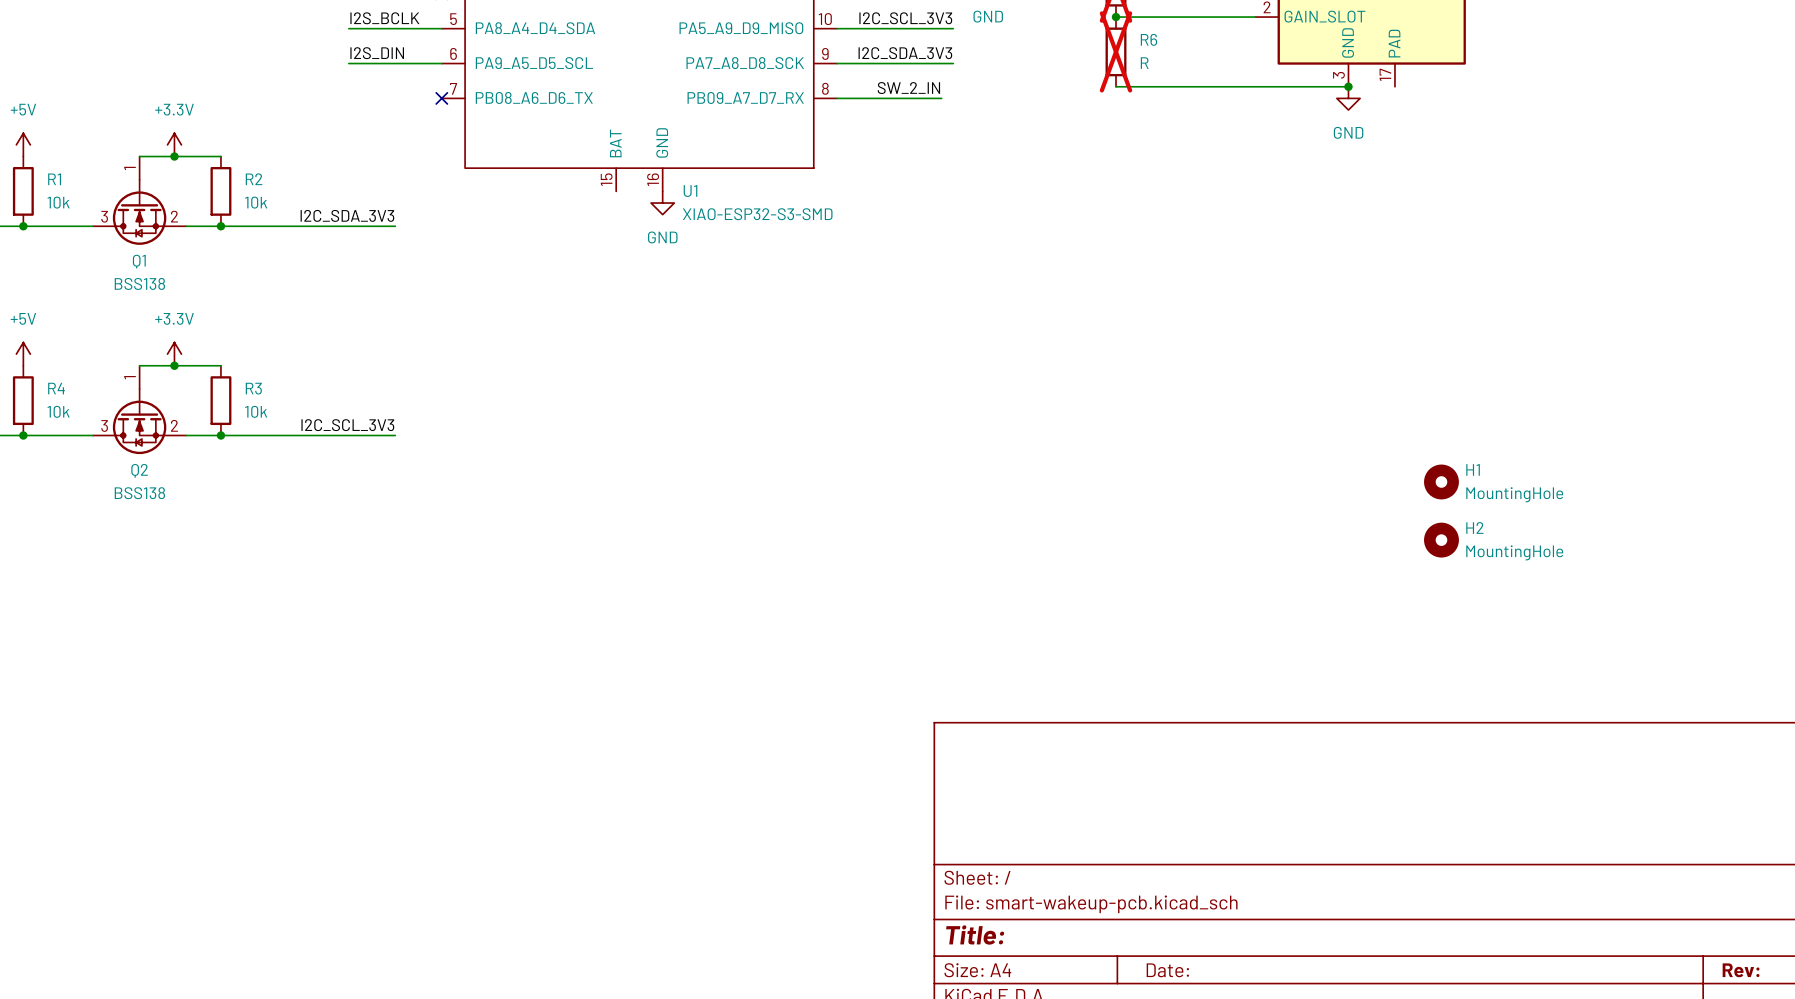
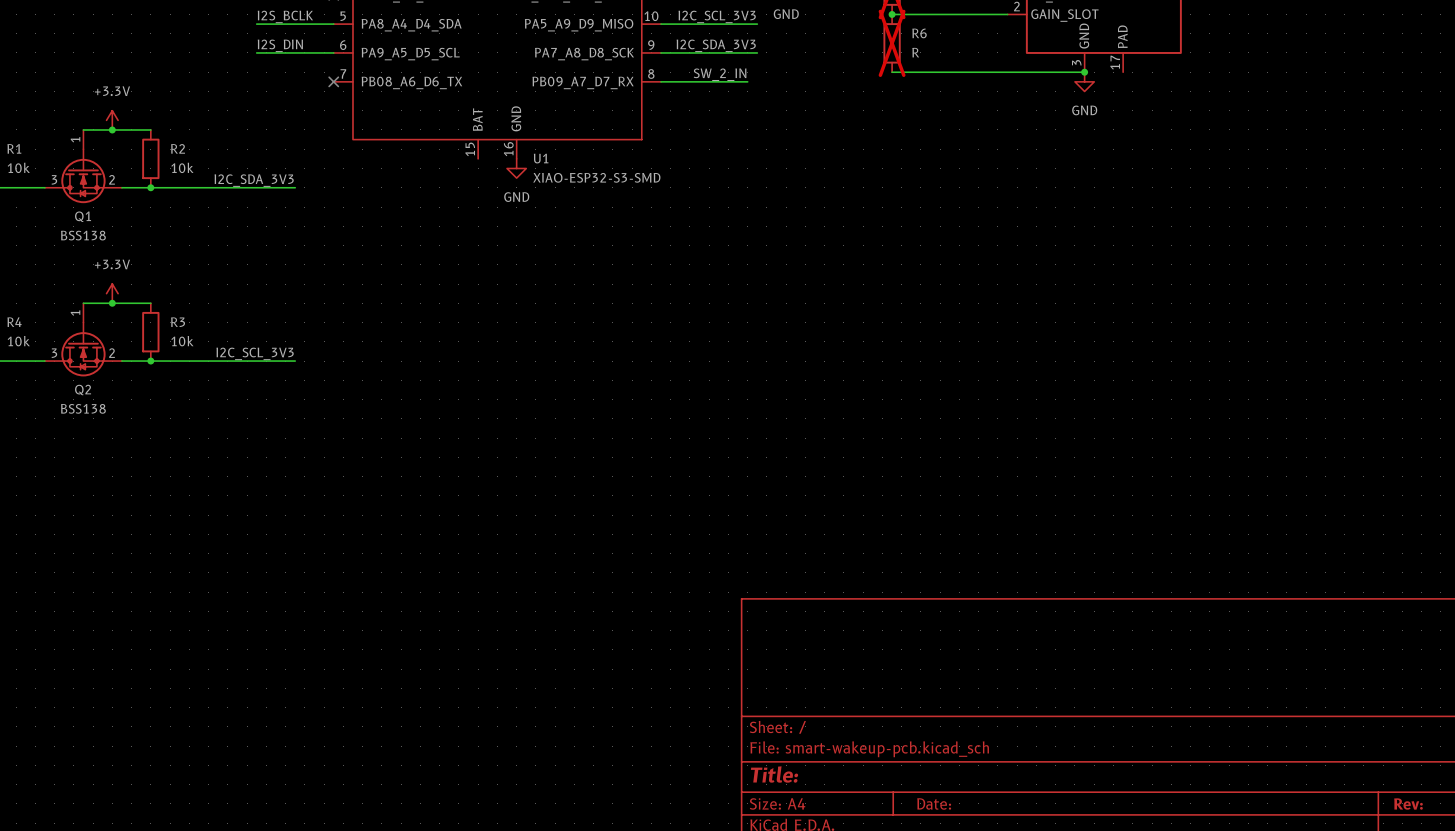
H1: MountingHole (1441, 481) -> none
H2: MountingHole (1441, 540) -> none

